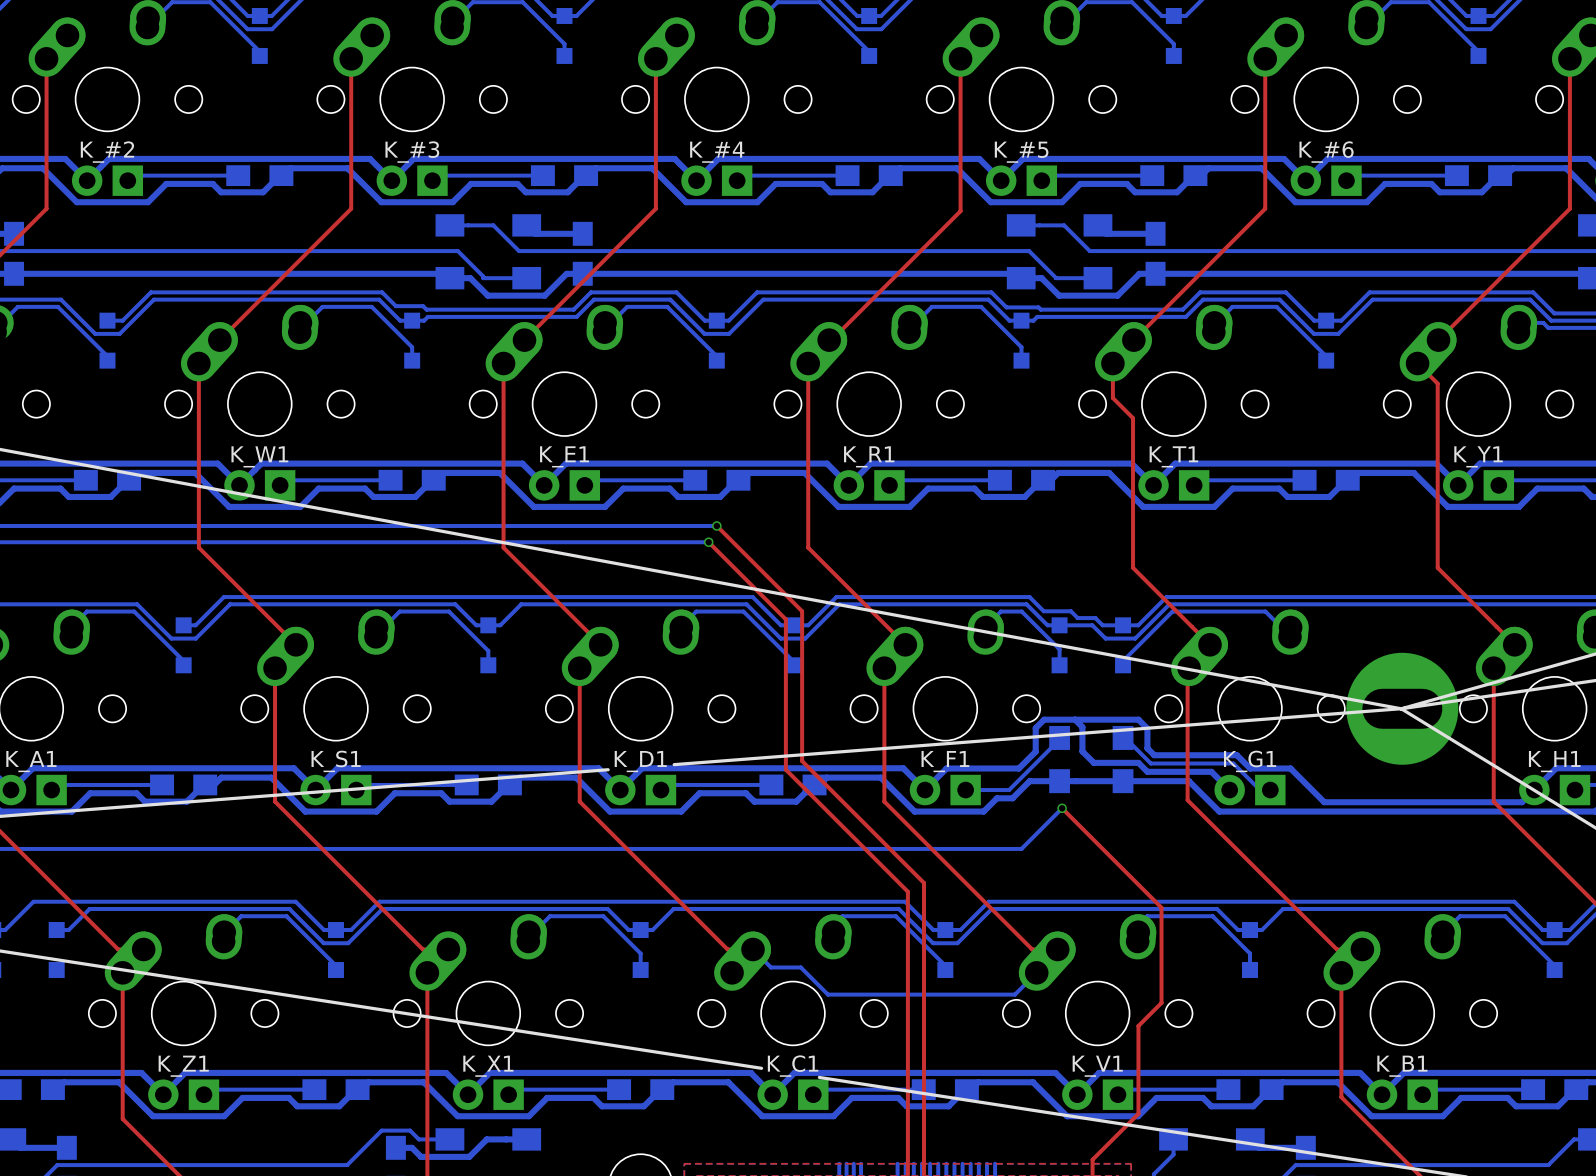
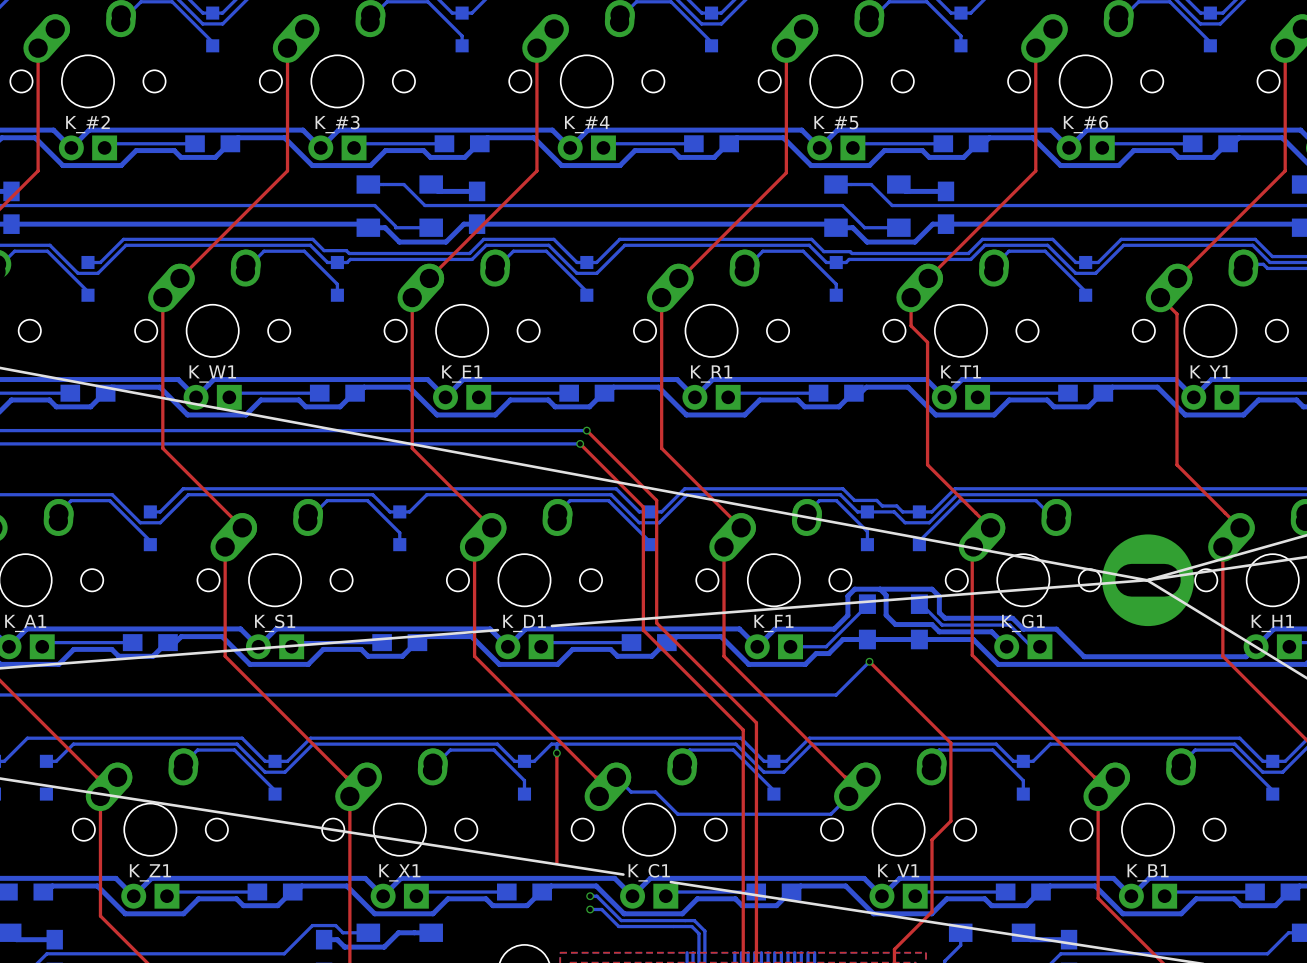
bottom track: none -> (556, 744) (556, 753)
top track: none -> (556, 753) (556, 862)
via: none -> (556, 753)
bottom track: none -> (590, 896) (596, 896) (621, 920) (694, 920) (704, 931) (704, 952)
via: none -> (590, 896)
bottom track: none -> (590, 909) (601, 909) (618, 926) (691, 926) (698, 933) (698, 952)
via: none -> (590, 909)

